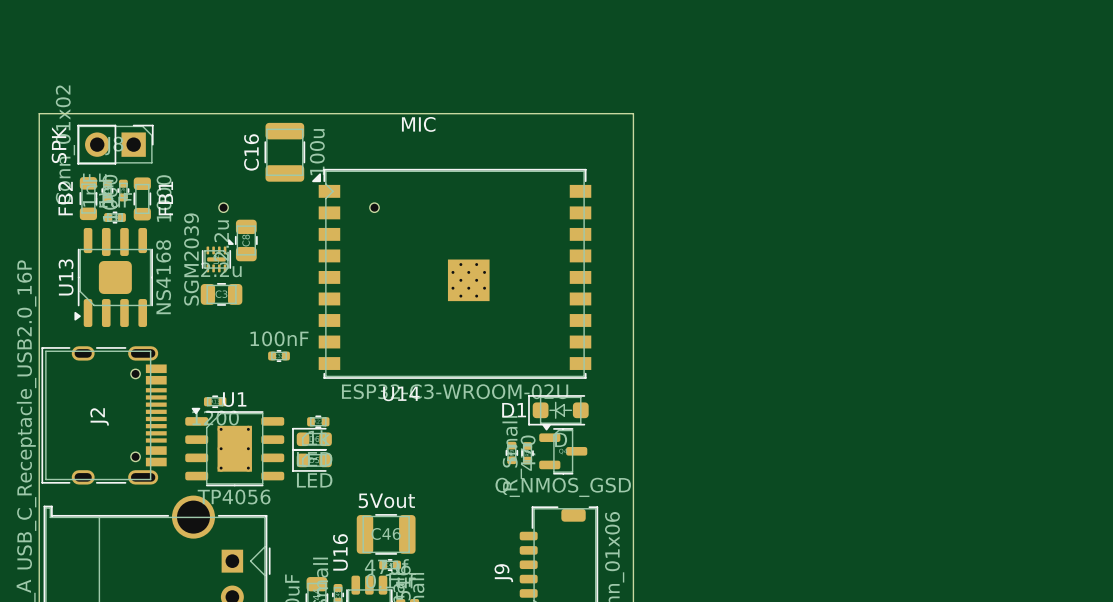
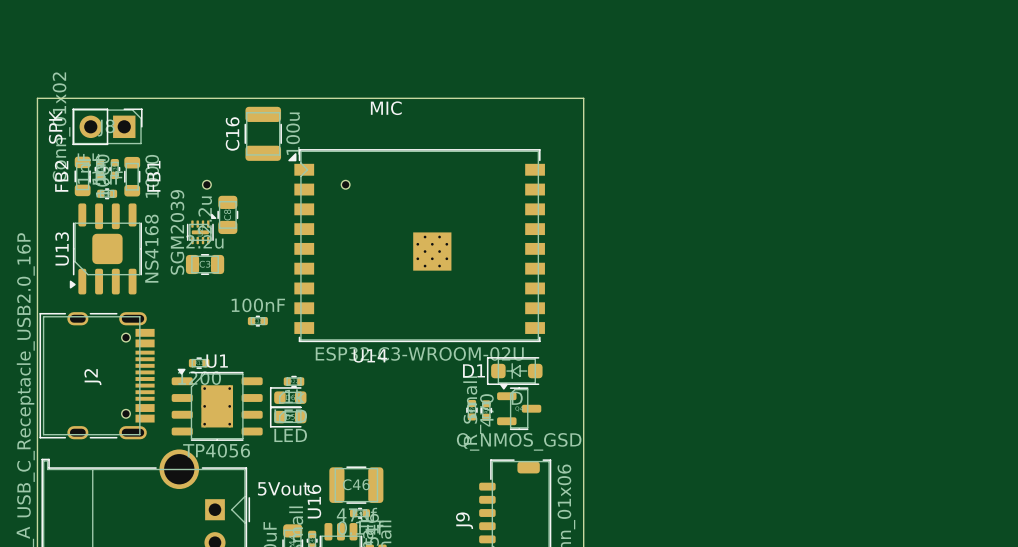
text position: 5Vout (386, 500) -> 5Vout (283, 488)

